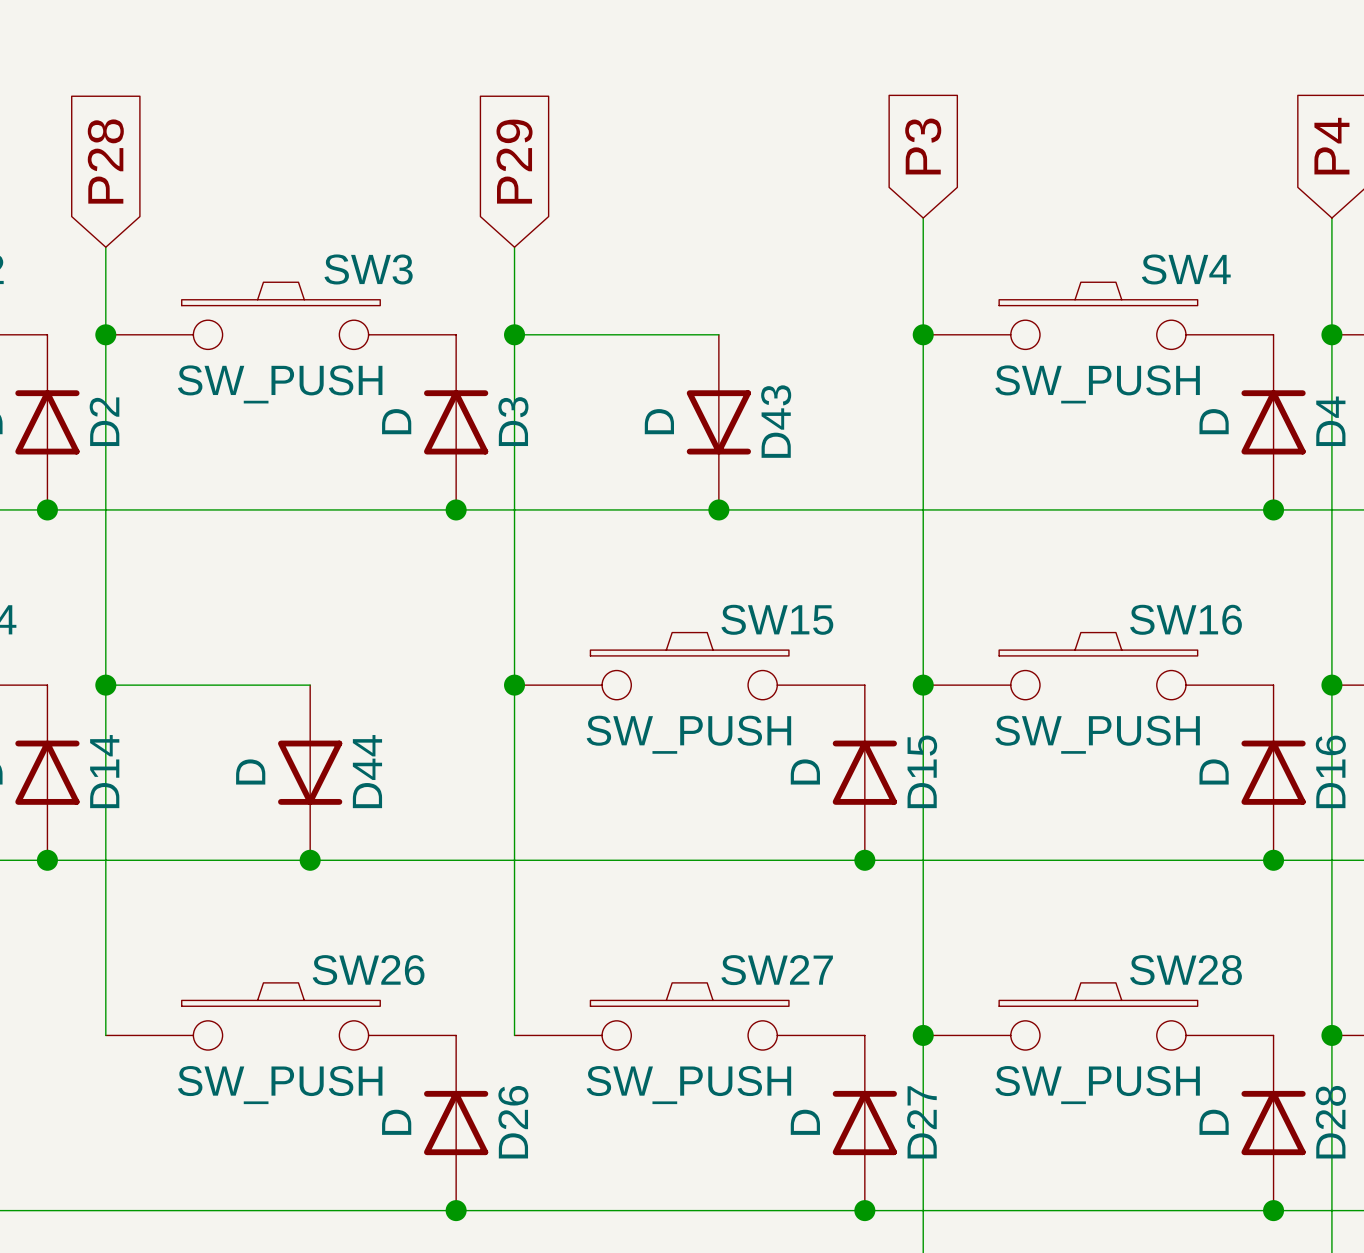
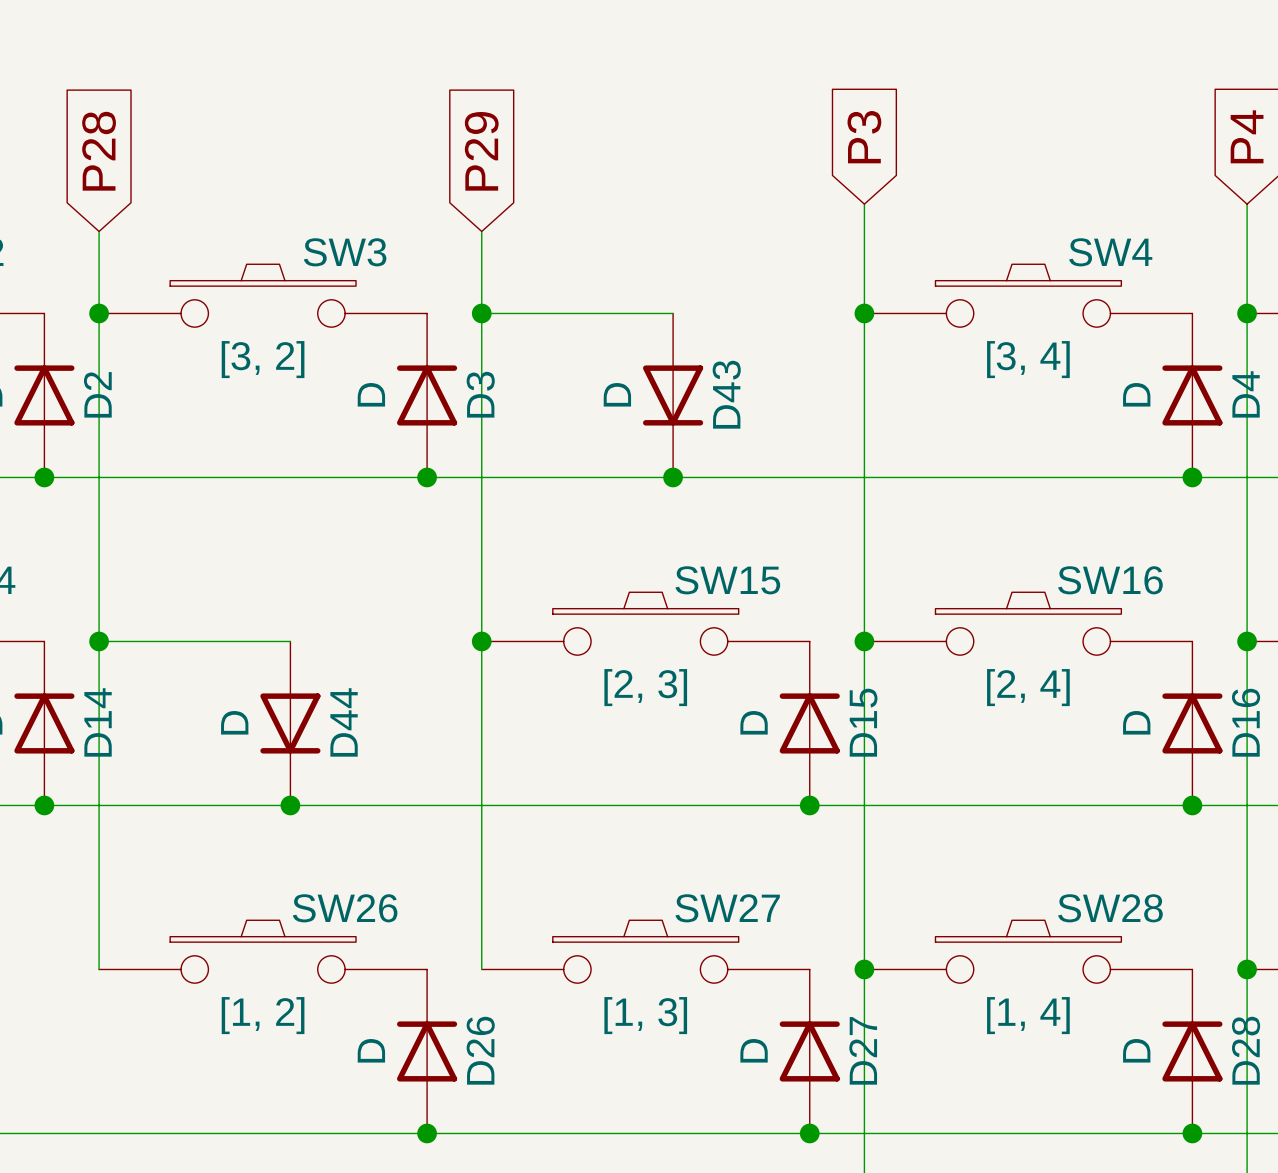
SW3 value: SW_PUSH (280, 384) -> [3, 2] (263, 359)
SW4 value: SW_PUSH (1097, 384) -> [3, 4] (1028, 359)
SW15 value: SW_PUSH (688, 734) -> [2, 3] (645, 687)
SW16 value: SW_PUSH (1097, 734) -> [2, 4] (1028, 687)
SW26 value: SW_PUSH (280, 1085) -> [1, 2] (263, 1015)
SW27 value: SW_PUSH (688, 1085) -> [1, 3] (645, 1015)
SW28 value: SW_PUSH (1097, 1085) -> [1, 4] (1028, 1015)

